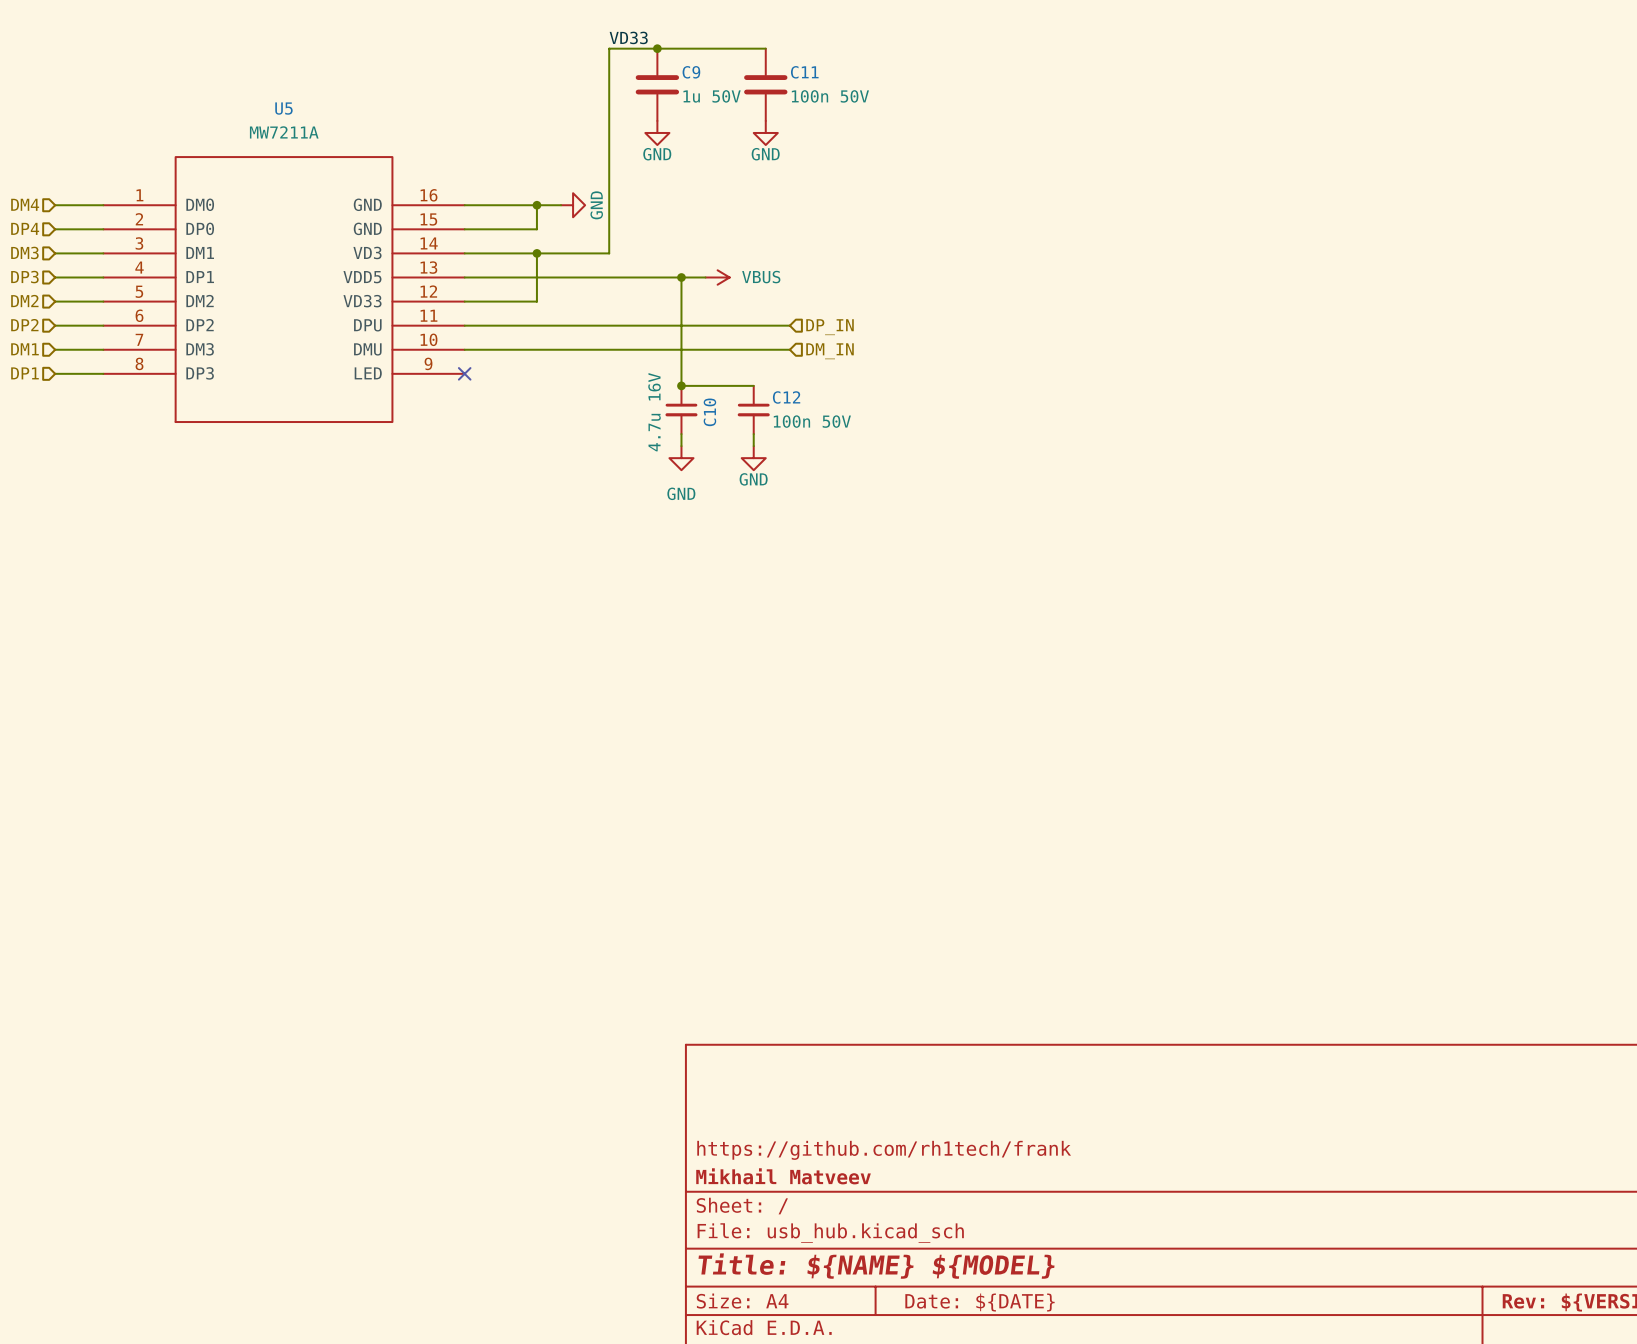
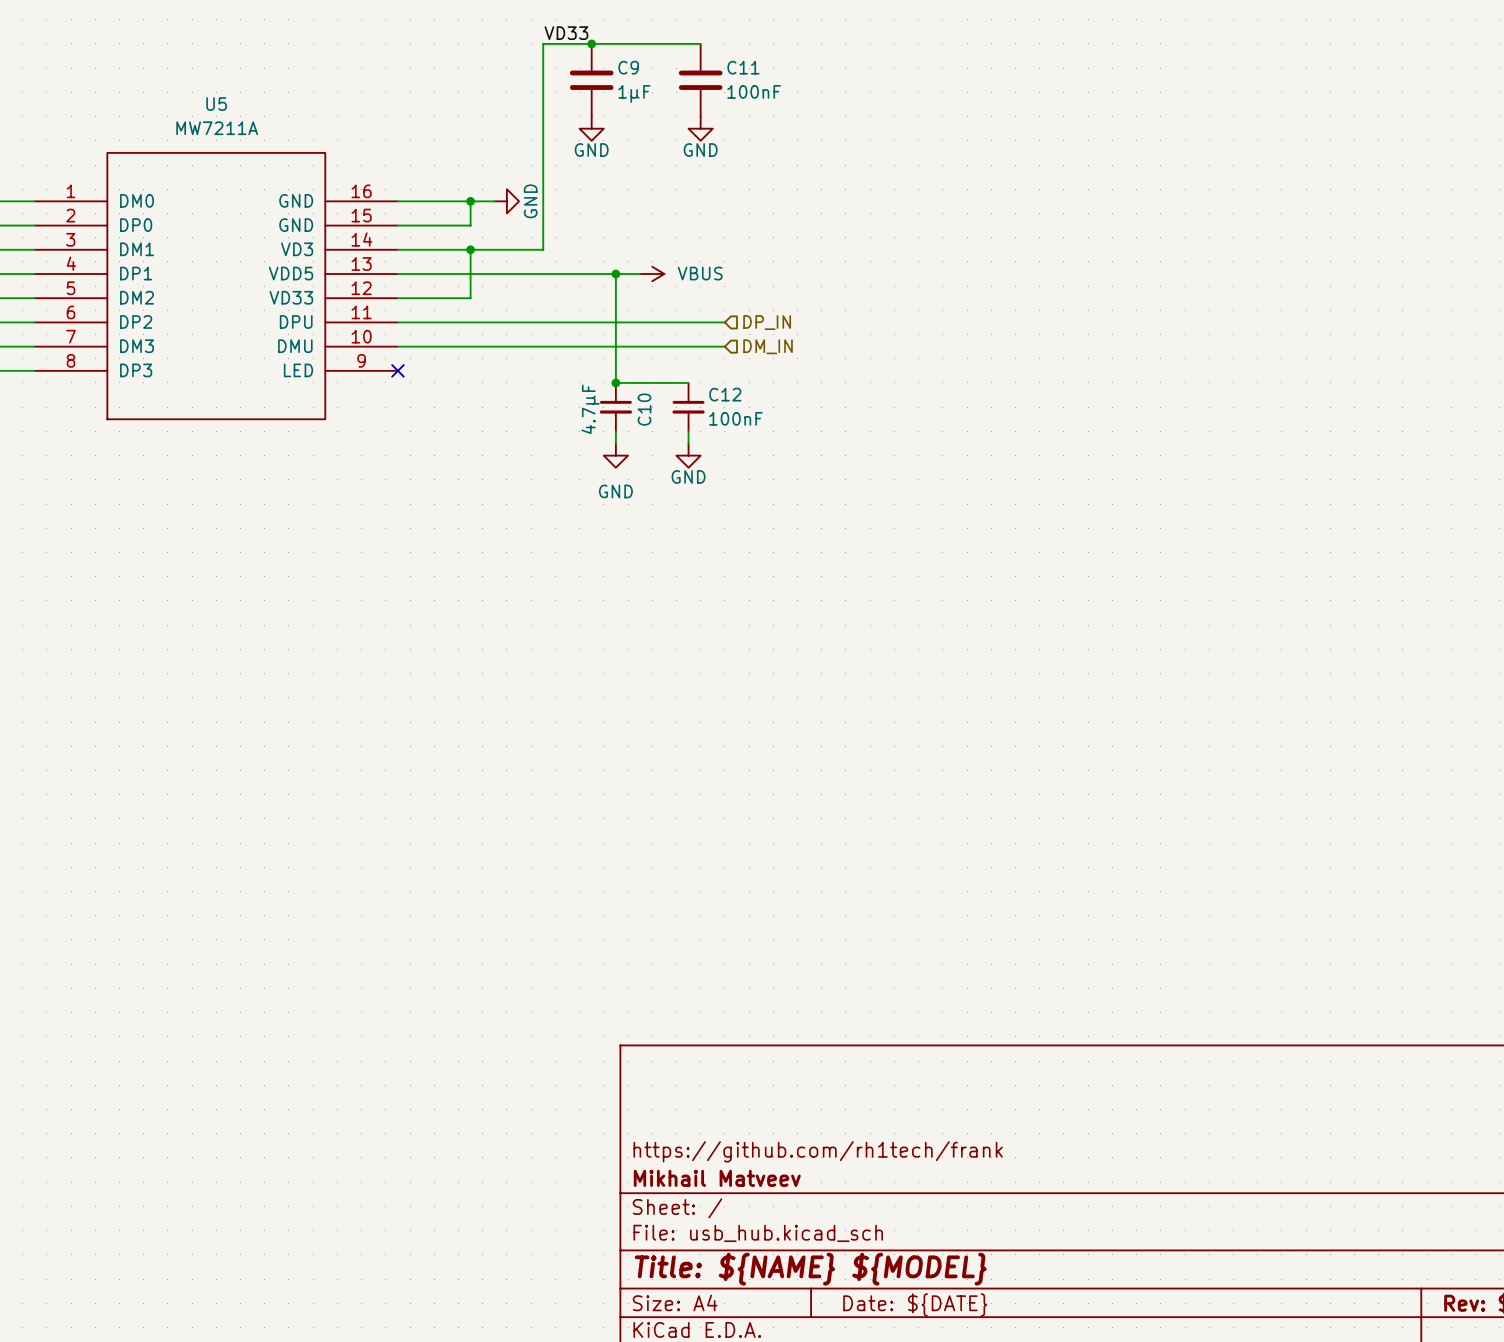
C9 value: 1u 50V (712, 96) -> 1µF (634, 93)
C11 value: 100n 50V (830, 96) -> 100nF (754, 91)
C10 value: 4.7u 16V (654, 412) -> 4.7µF (590, 409)
C12 value: 100n 50V (812, 421) -> 100nF (735, 418)

